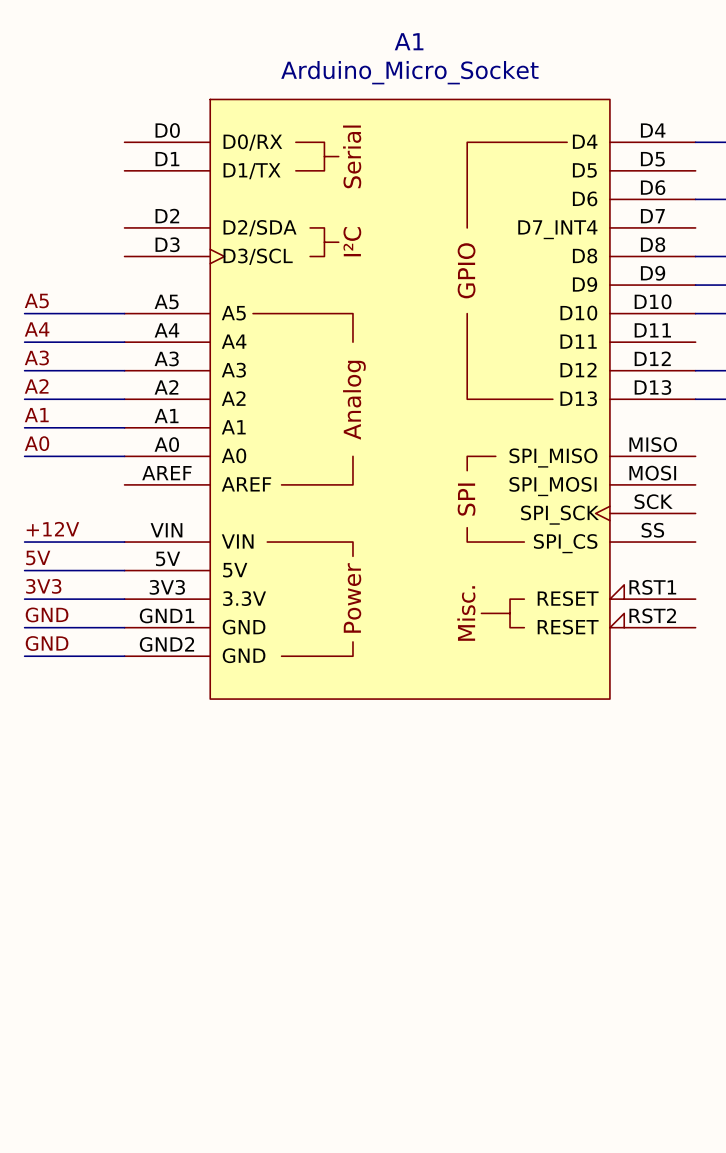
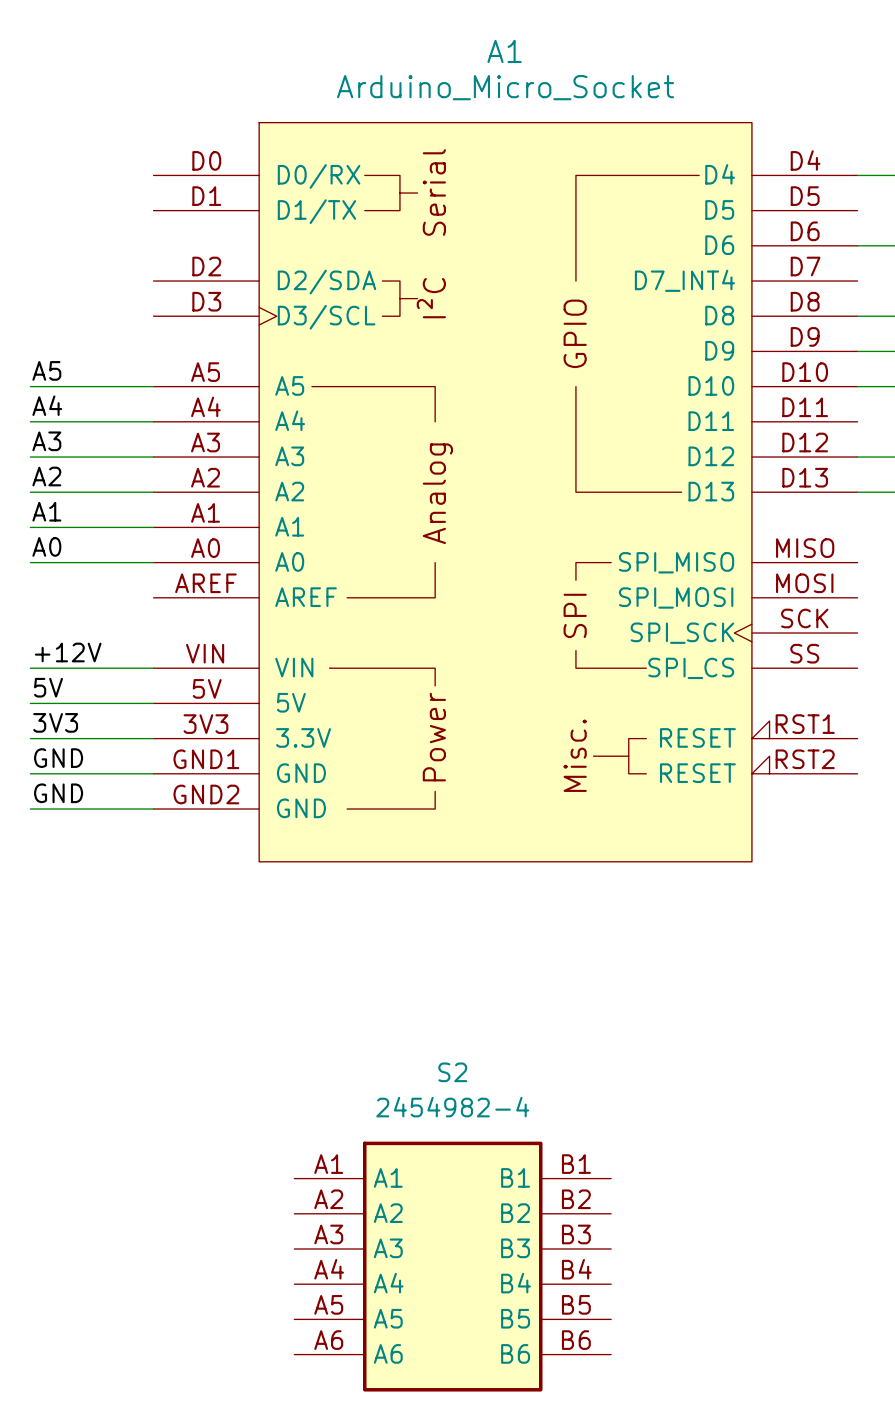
S2: none -> 2454982-4 (452, 1266)

